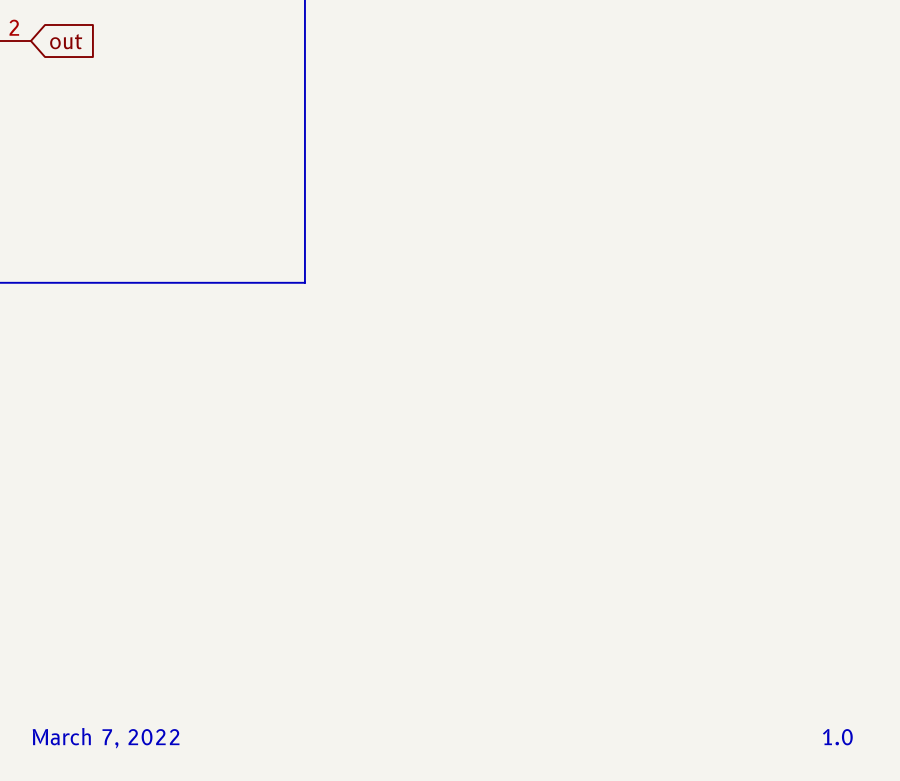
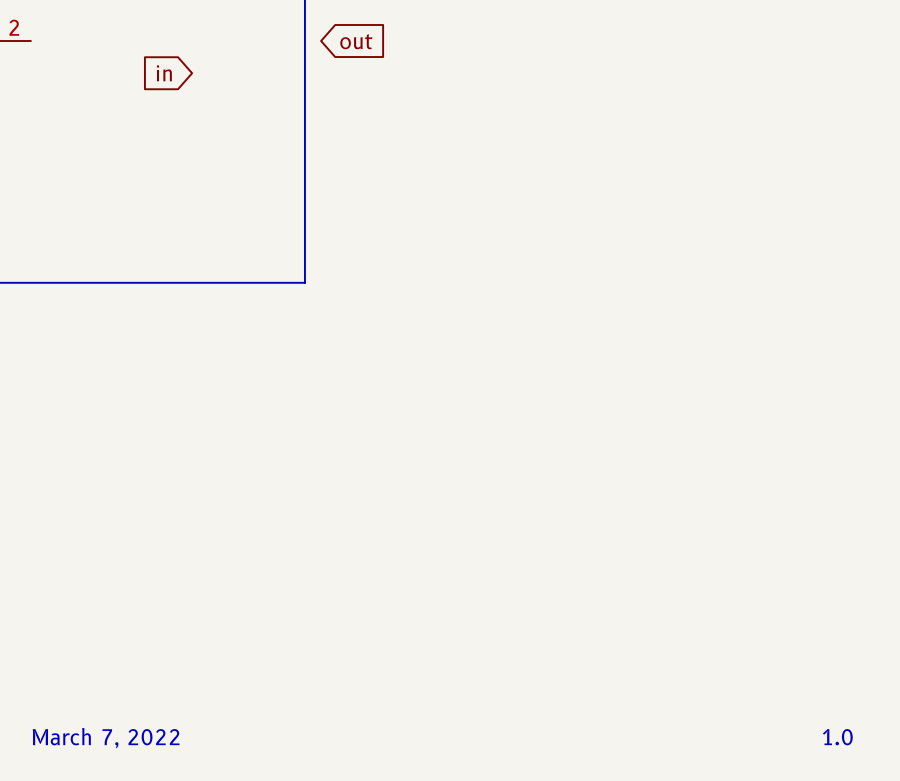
global label: out (66, 41) -> none
global label: none -> out (356, 41)
global label: none -> in (164, 73)

